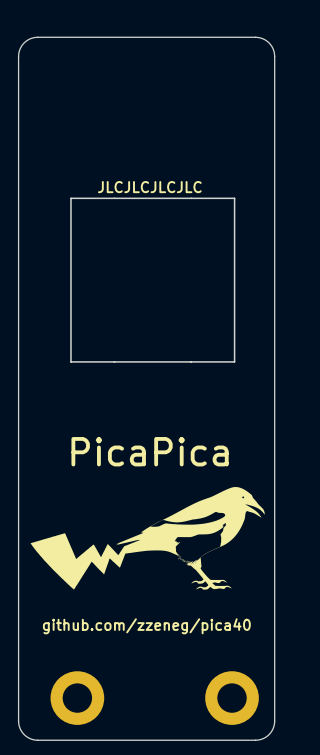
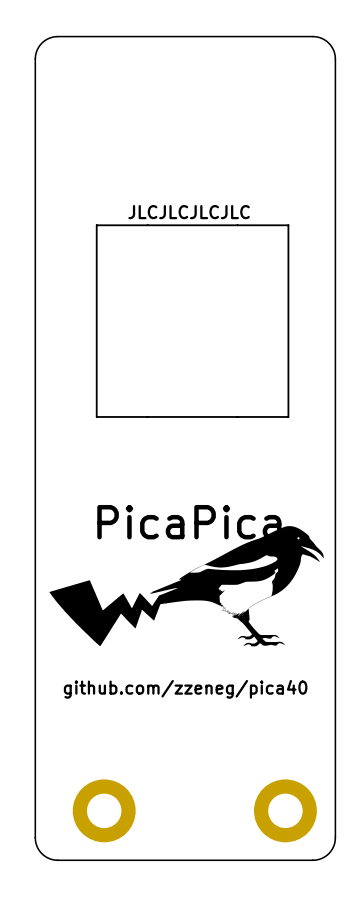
drawing position: (147, 538) -> (186, 586)
text position: github.com/zzeneg/pica40 (146, 626) -> github.com/zzeneg/pica40 (185, 689)

